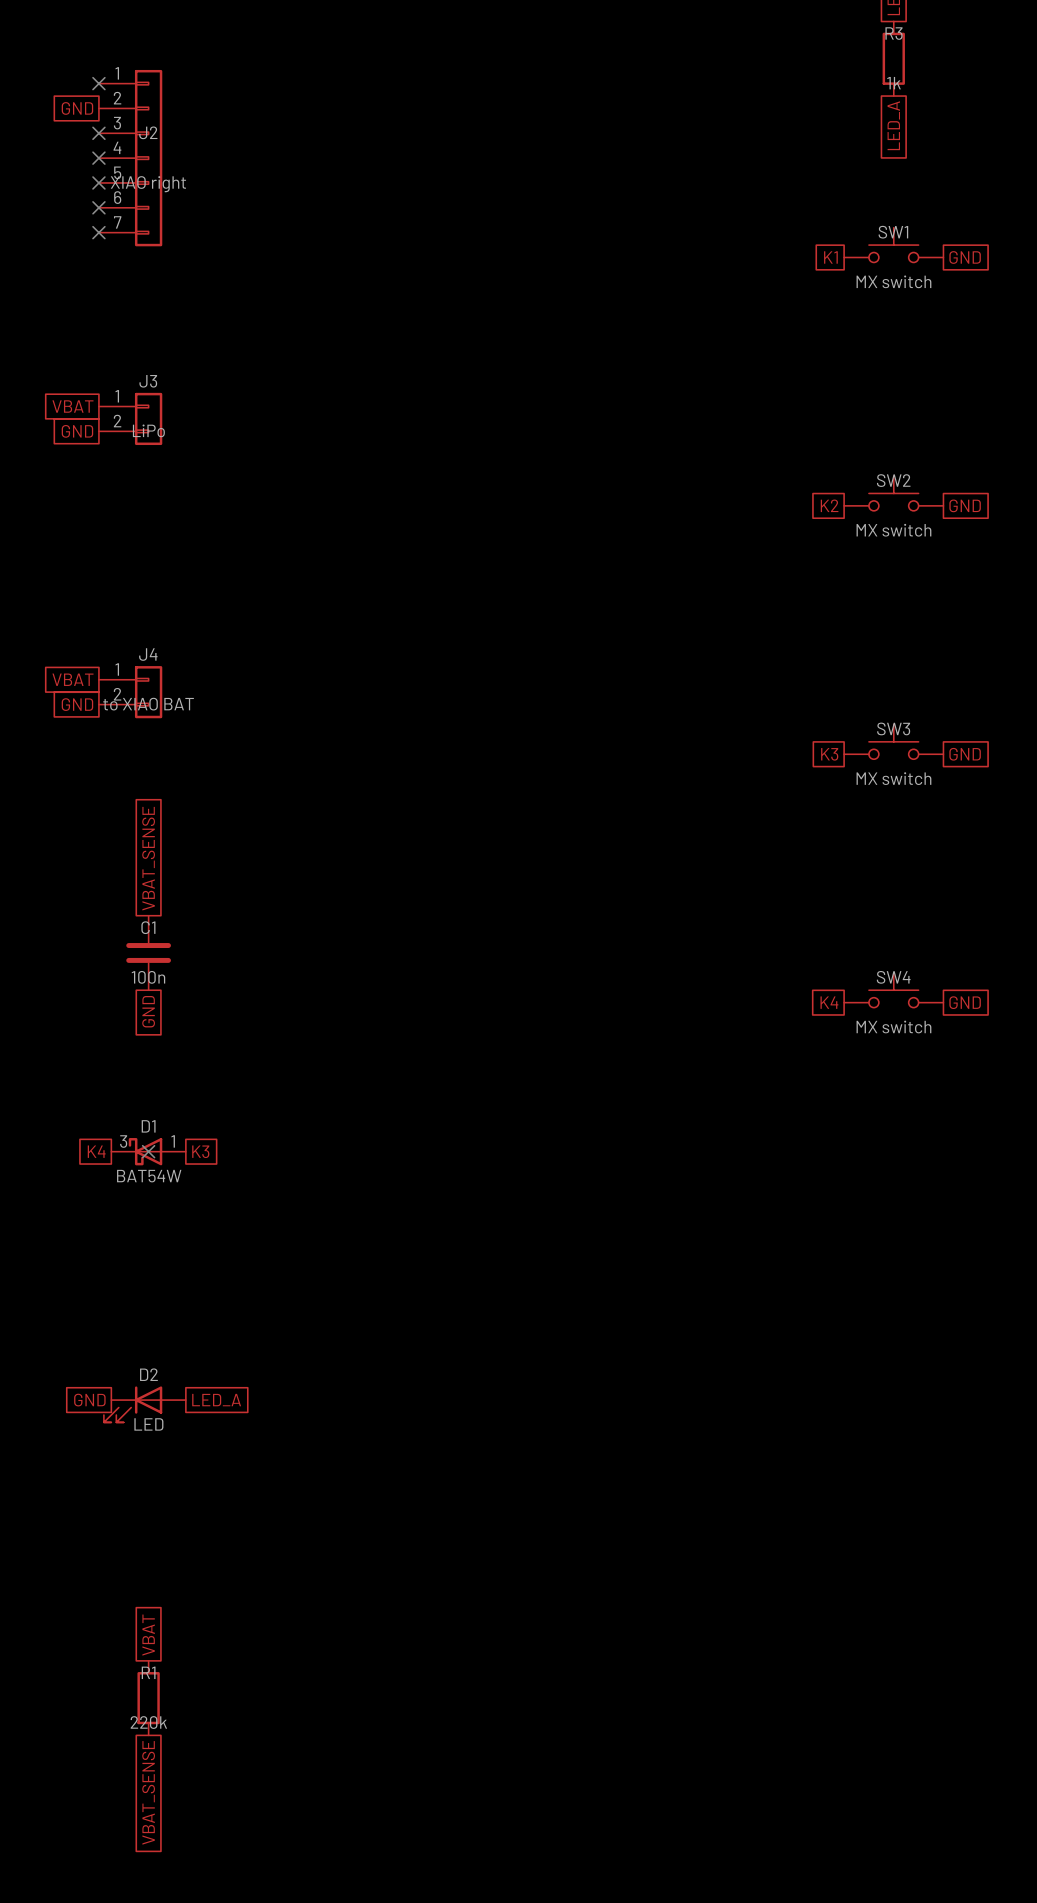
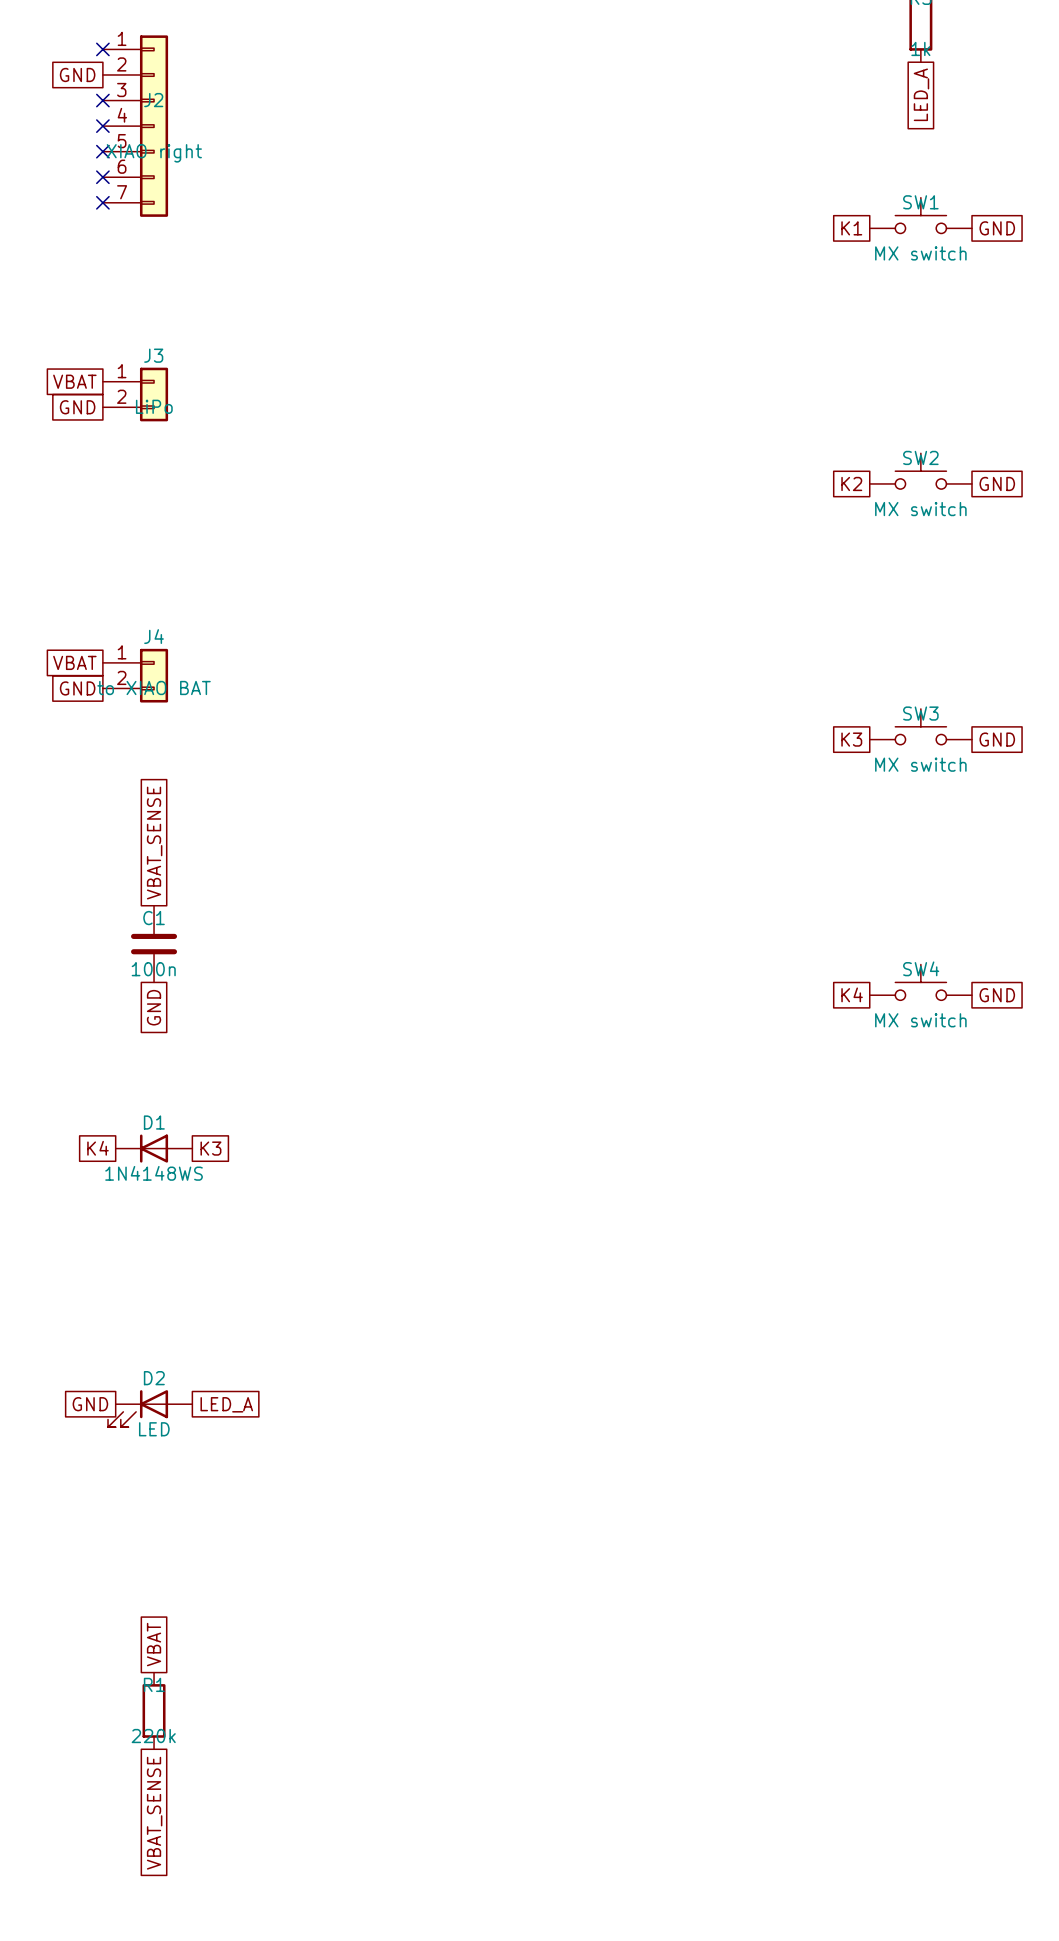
D1 symbol: [111, 1138, 186, 1166] -> [115, 1134, 193, 1163]
no-connect mark: (148, 1151) -> none
D1 value: BAT54W (149, 1176) -> 1N4148WS (154, 1173)

